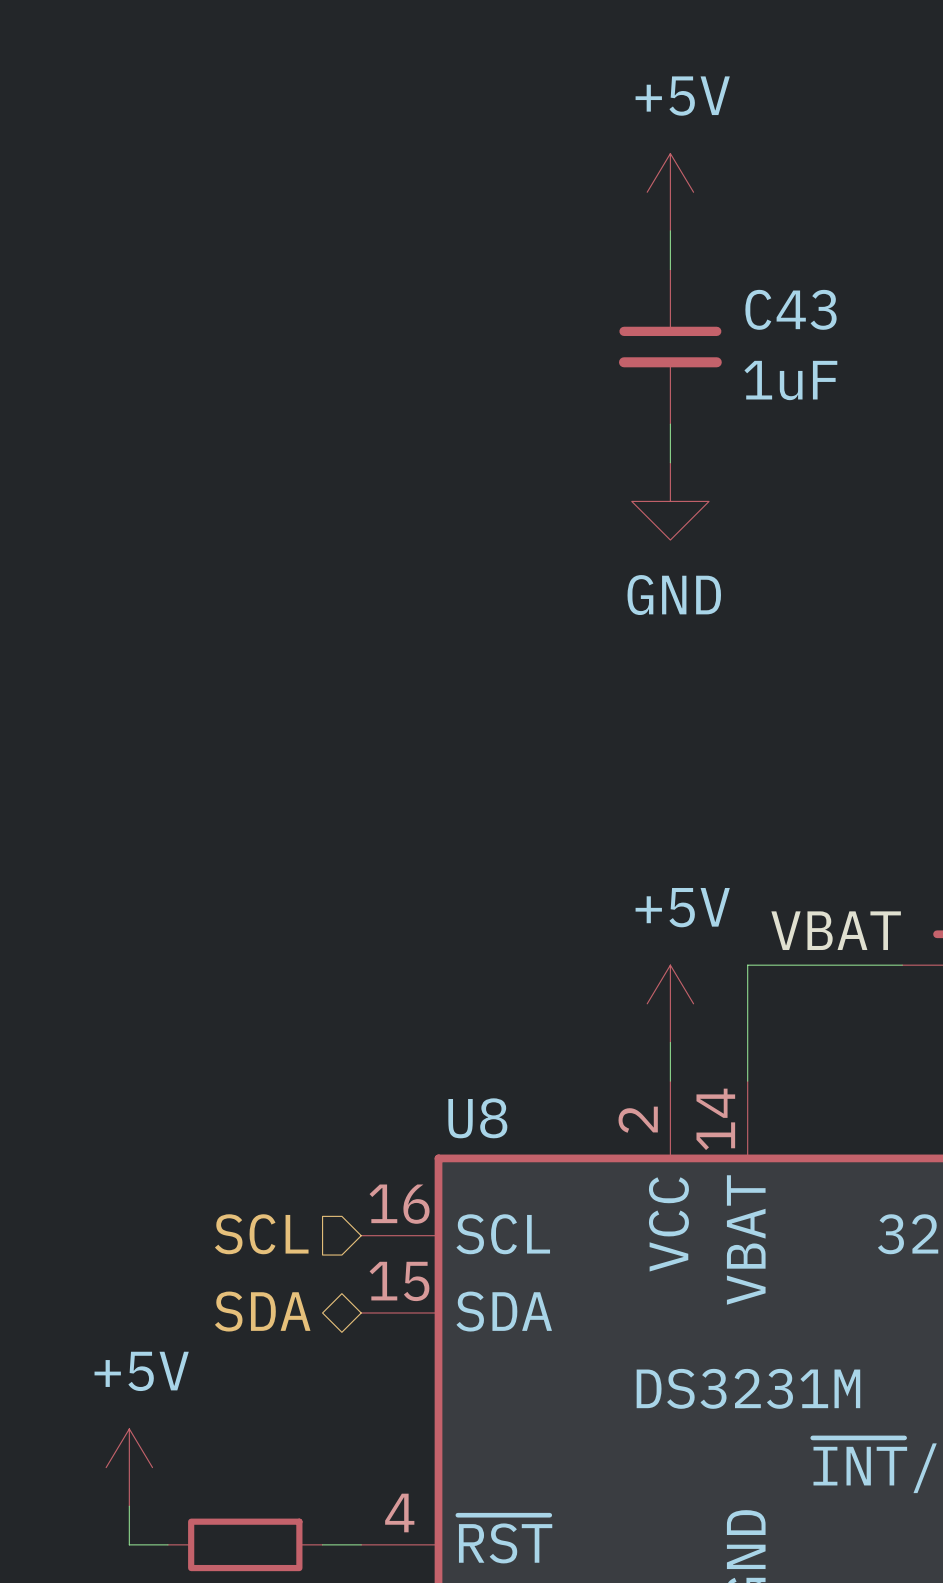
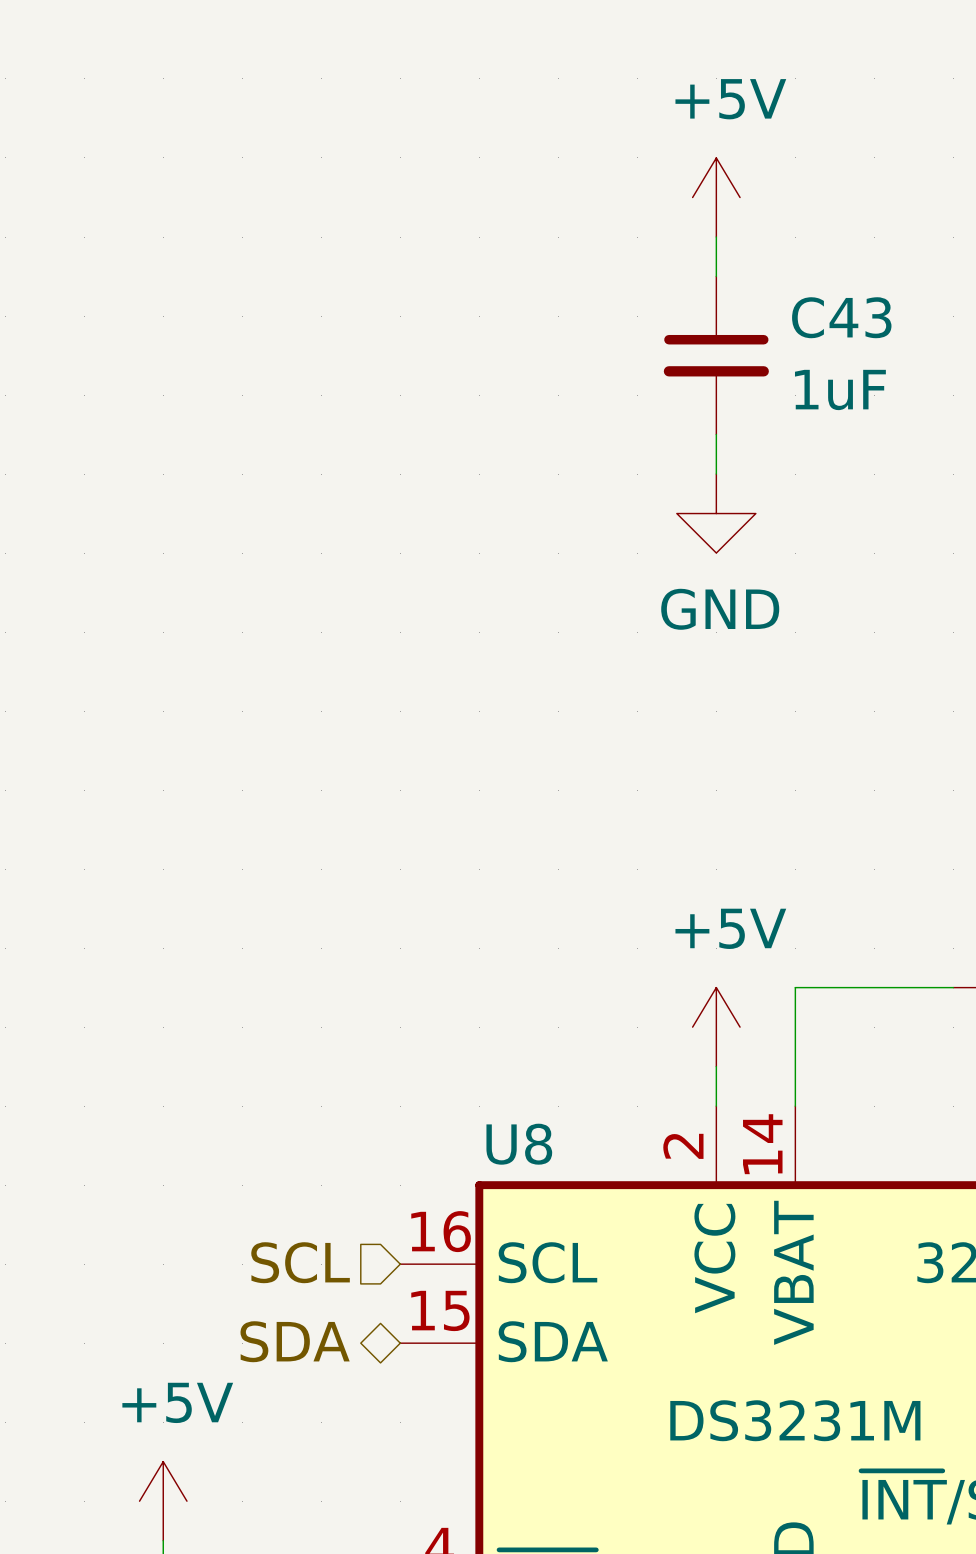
label: VBAT (836, 930) -> none

